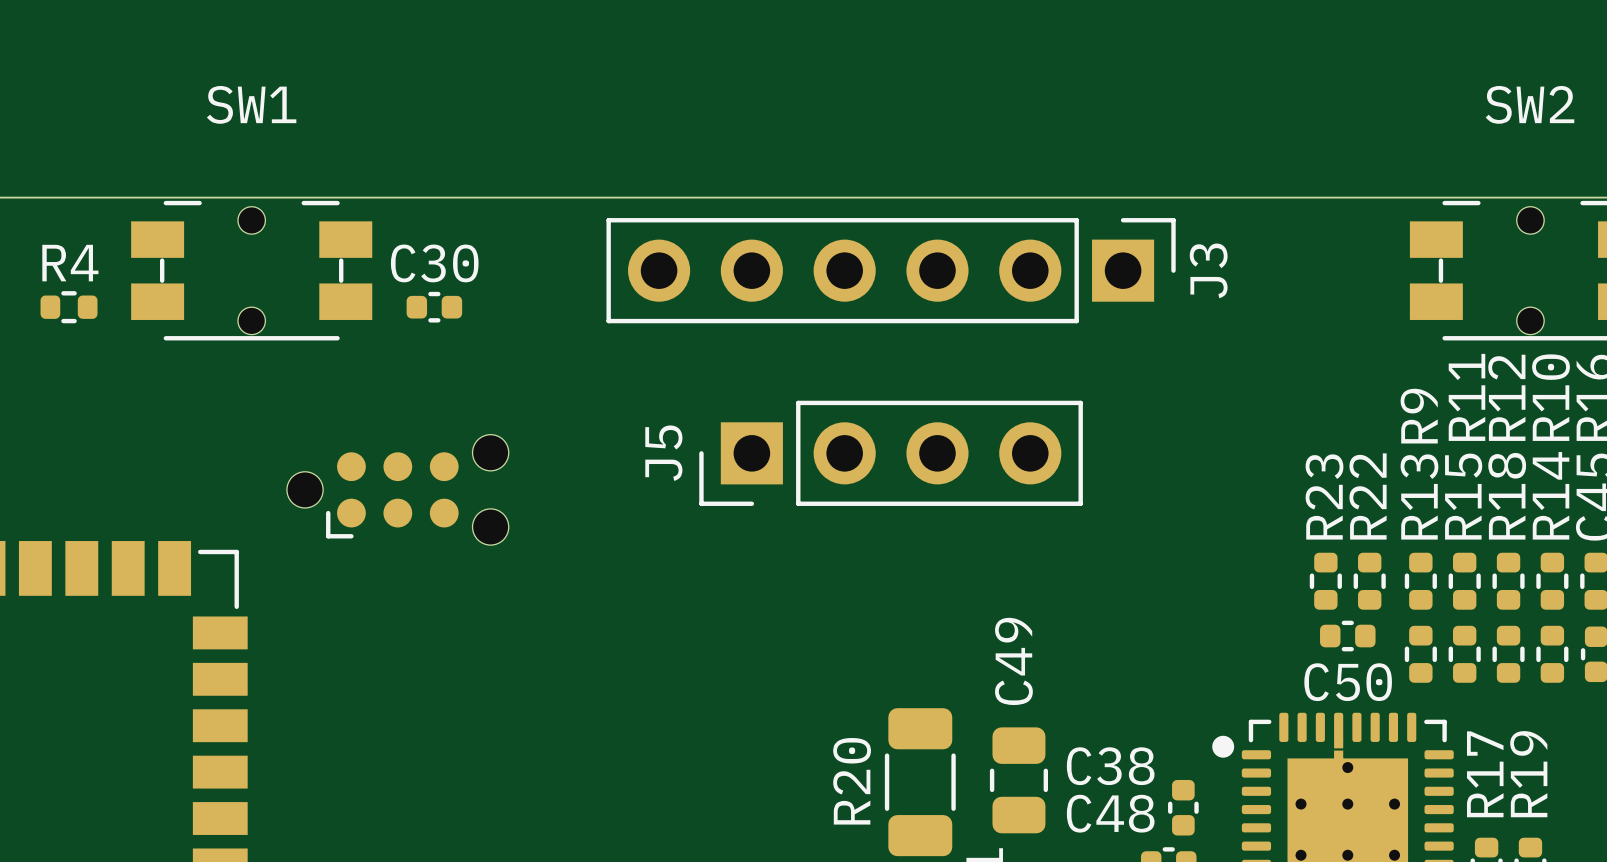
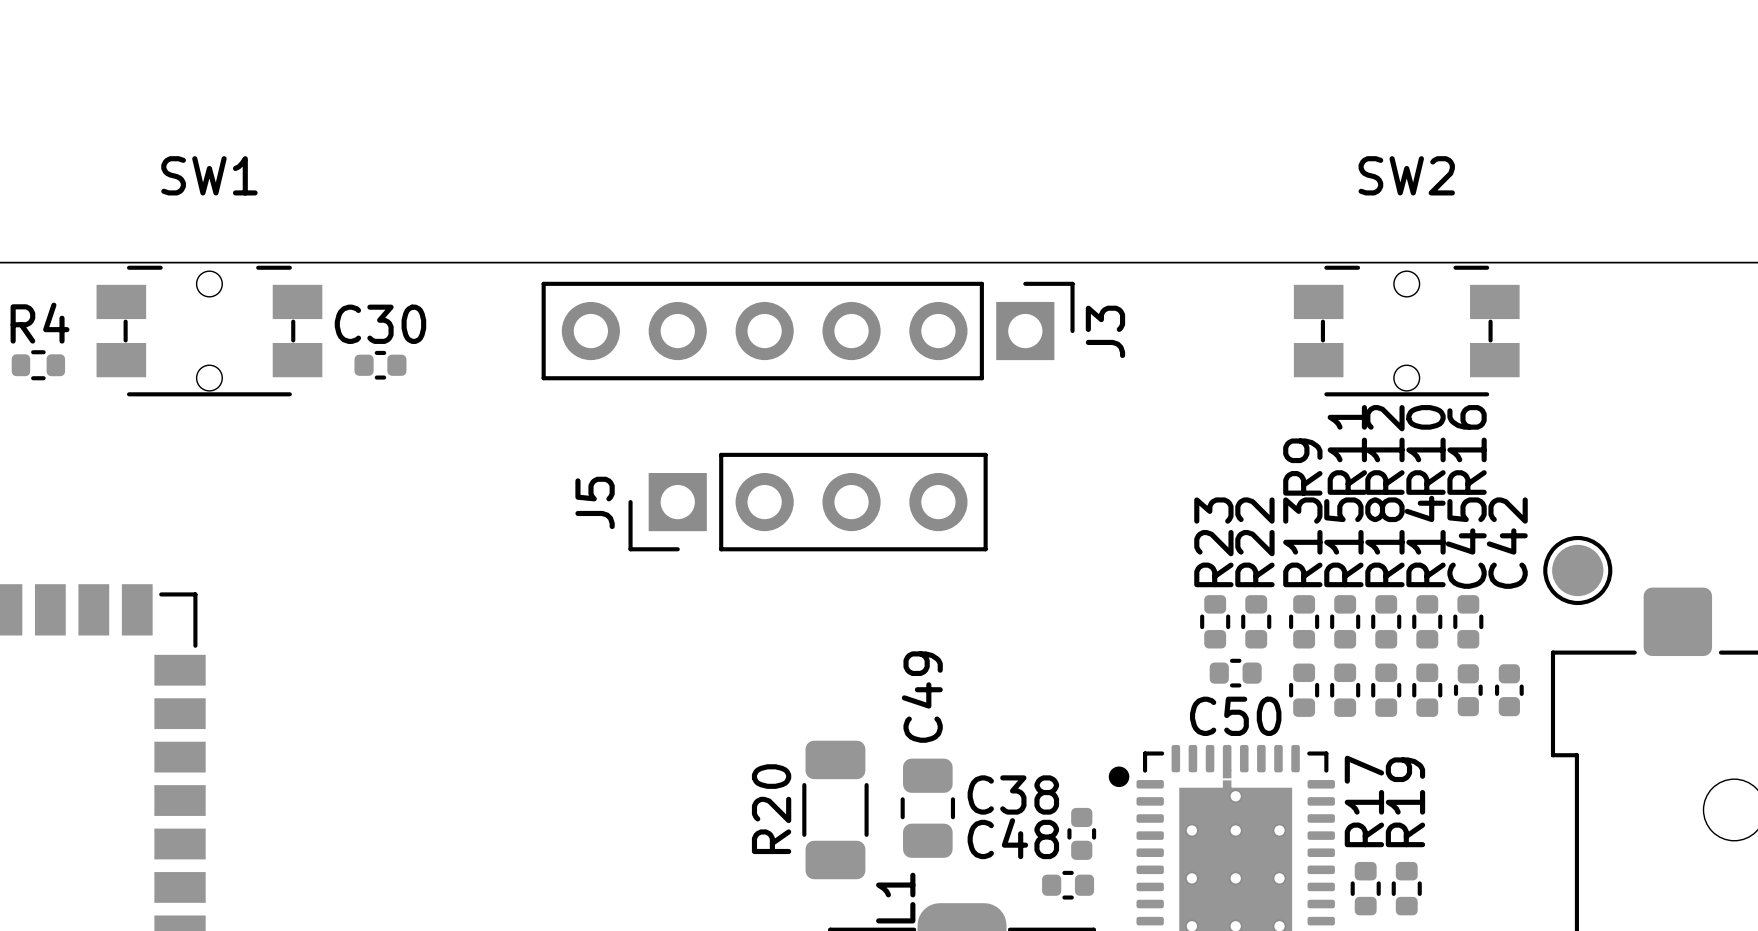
part: (397, 489) -> none

